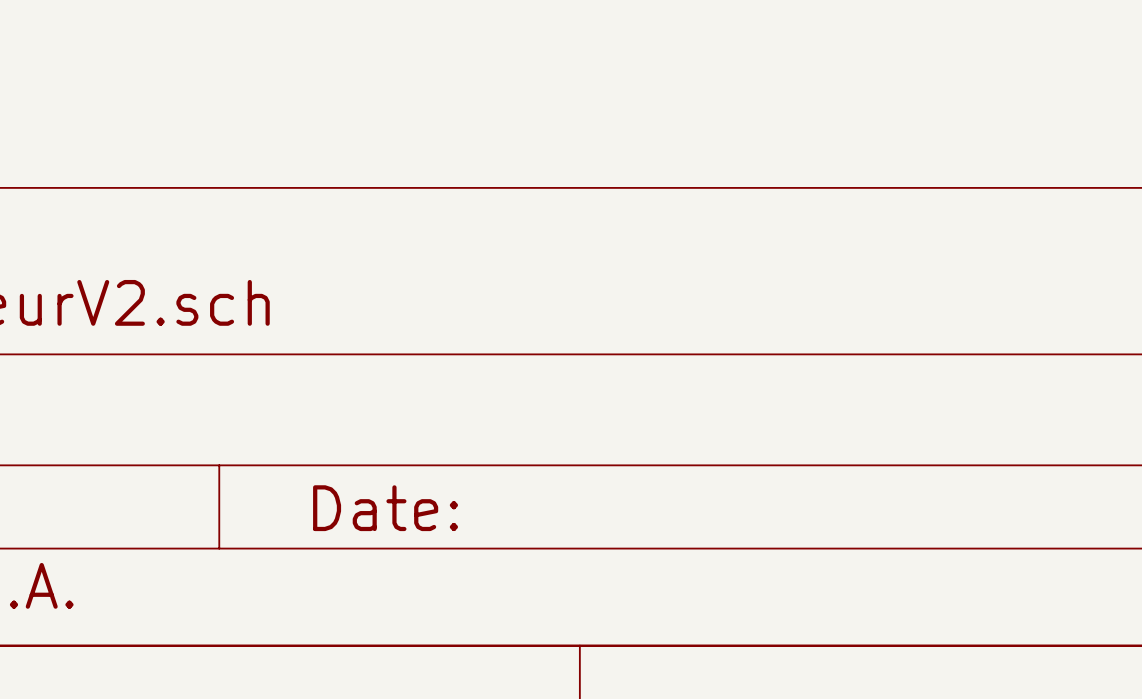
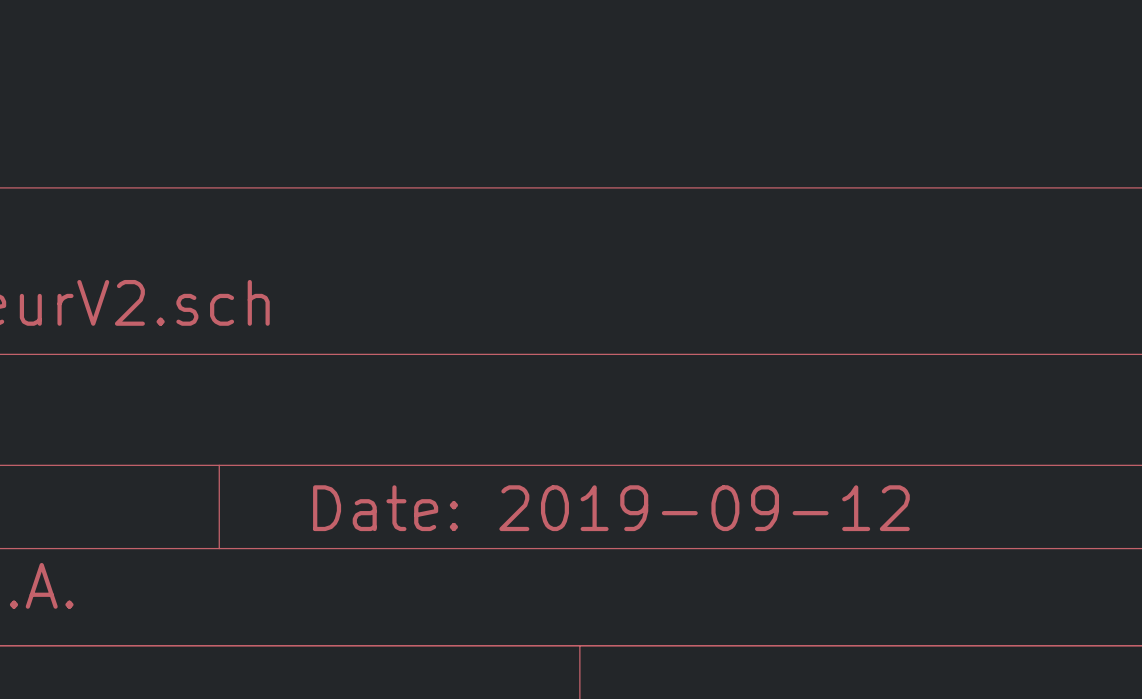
title block: Date: (385, 508) -> Date: 2019-09-12 (611, 508)

